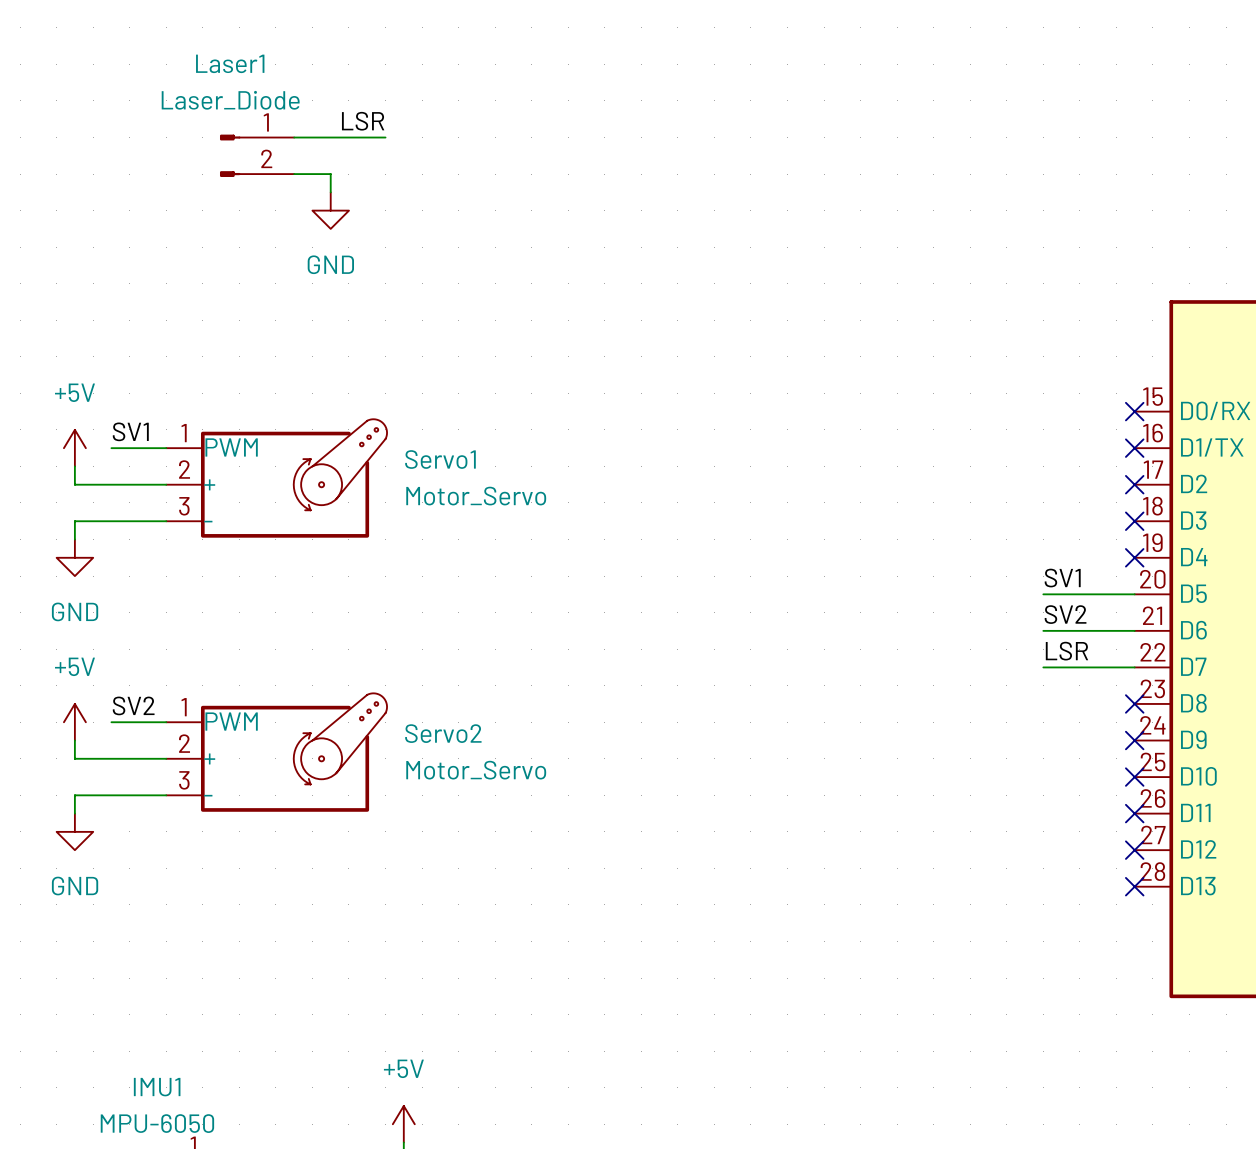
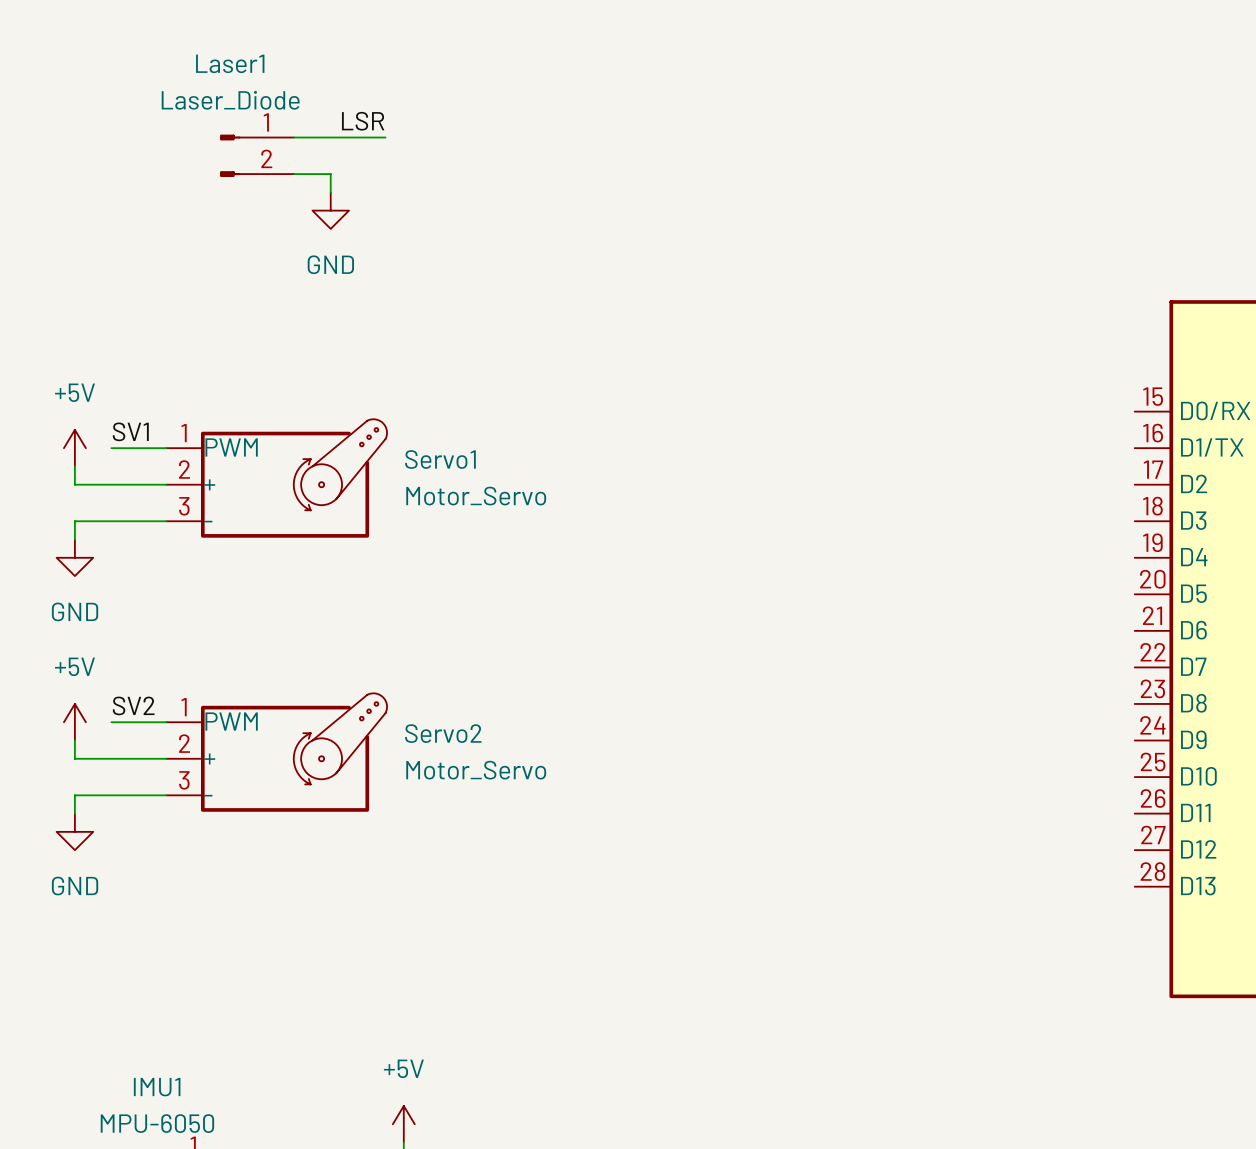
no-connect mark: (1134, 411) -> none
no-connect mark: (1134, 448) -> none
no-connect mark: (1134, 484) -> none
no-connect mark: (1134, 521) -> none
no-connect mark: (1134, 557) -> none
label: SV1 (1062, 578) -> none
wire: (1043, 594) (1134, 594) -> none
label: SV2 (1065, 614) -> none
wire: (1043, 630) (1134, 630) -> none
label: LSR (1066, 651) -> none
wire: (1043, 667) (1134, 667) -> none
no-connect mark: (1134, 703) -> none
no-connect mark: (1134, 740) -> none
no-connect mark: (1134, 777) -> none
no-connect mark: (1134, 813) -> none
no-connect mark: (1134, 850) -> none
no-connect mark: (1134, 886) -> none

